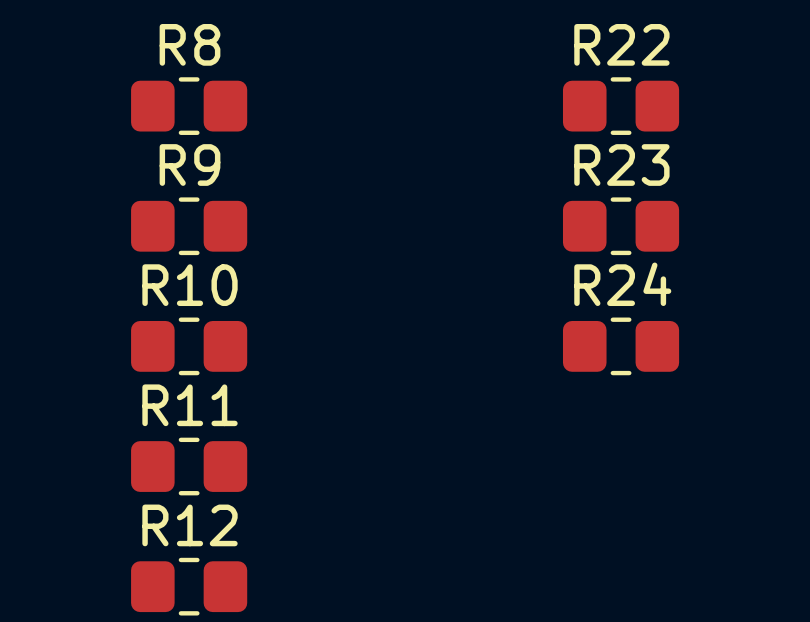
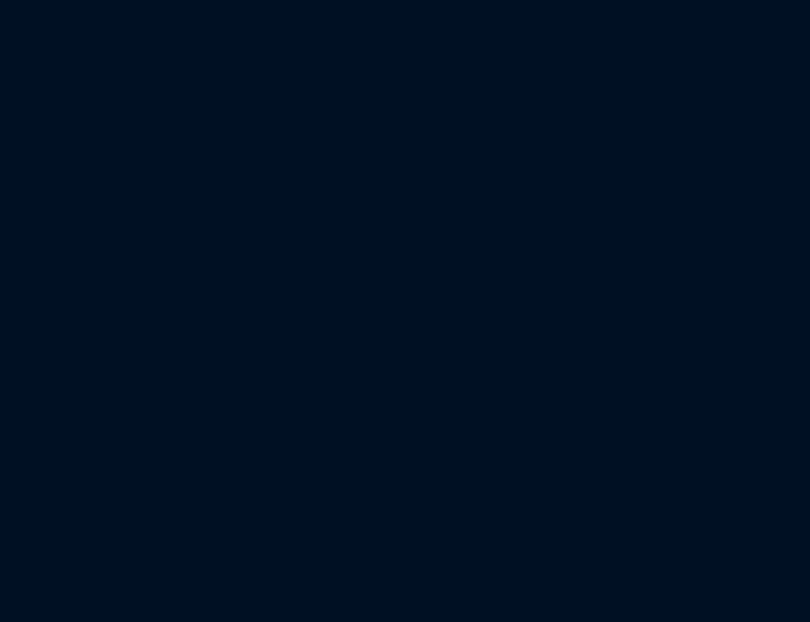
R8: (189, 106) -> none
R22: (621, 106) -> none
R9: (189, 226) -> none
R23: (621, 226) -> none
R10: (189, 346) -> none
R24: (621, 346) -> none
R11: (189, 466) -> none
R12: (189, 586) -> none

